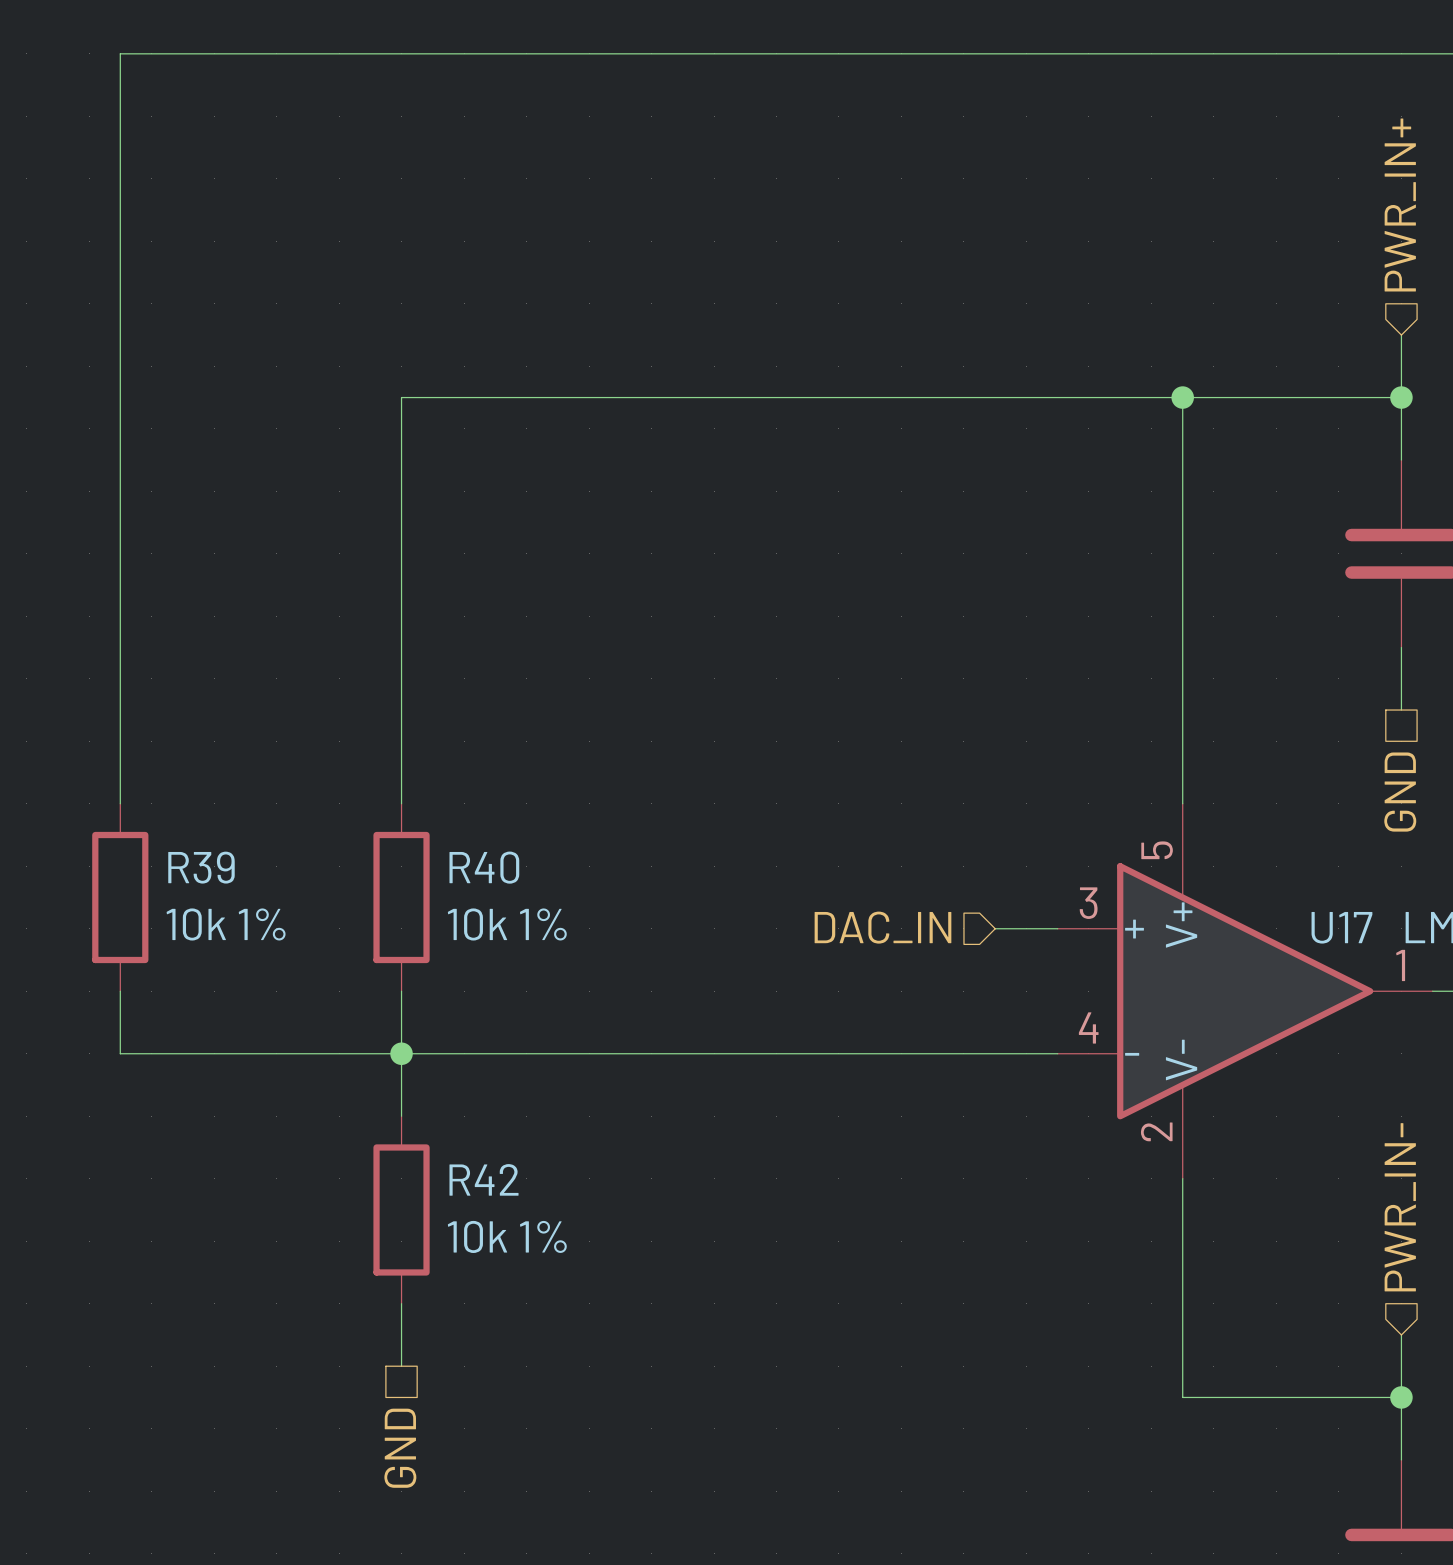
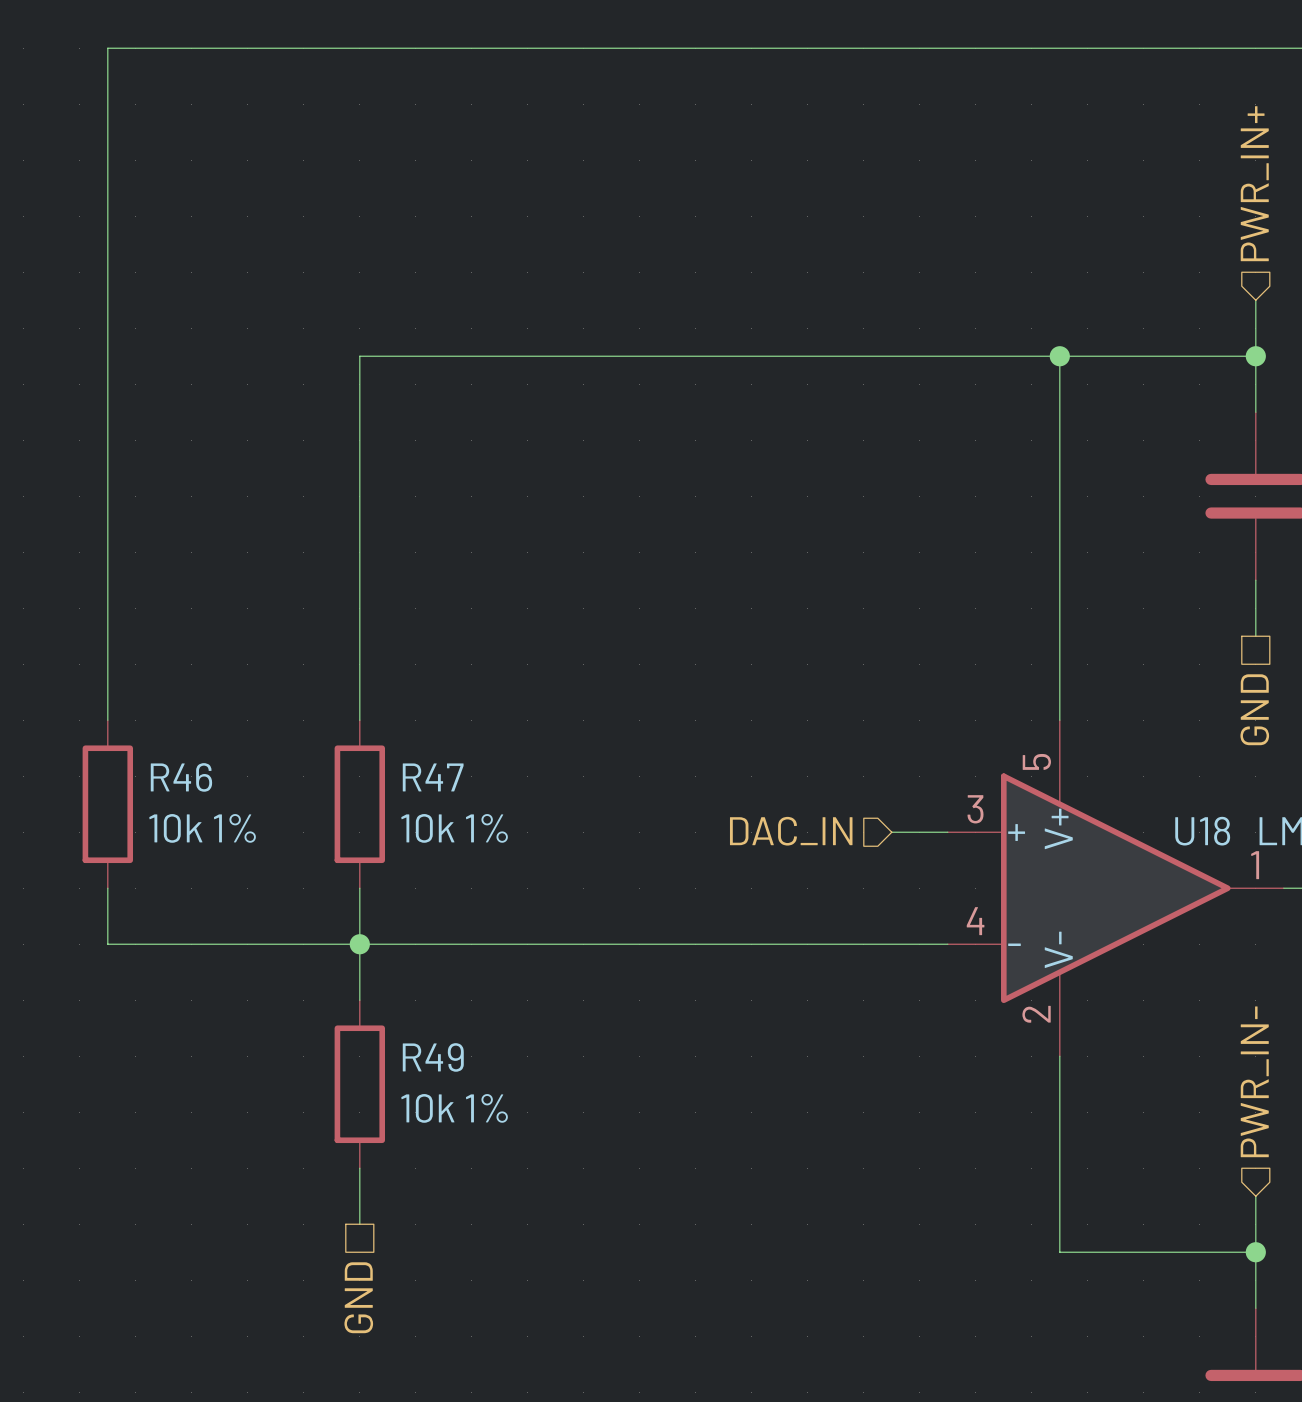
R39 name: R39 (201, 867) -> R46 (181, 777)
R40 name: R40 (484, 867) -> R47 (433, 777)
U17 name: U17 (1341, 927) -> U18 (1202, 831)
R42 name: R42 (484, 1179) -> R49 (433, 1057)

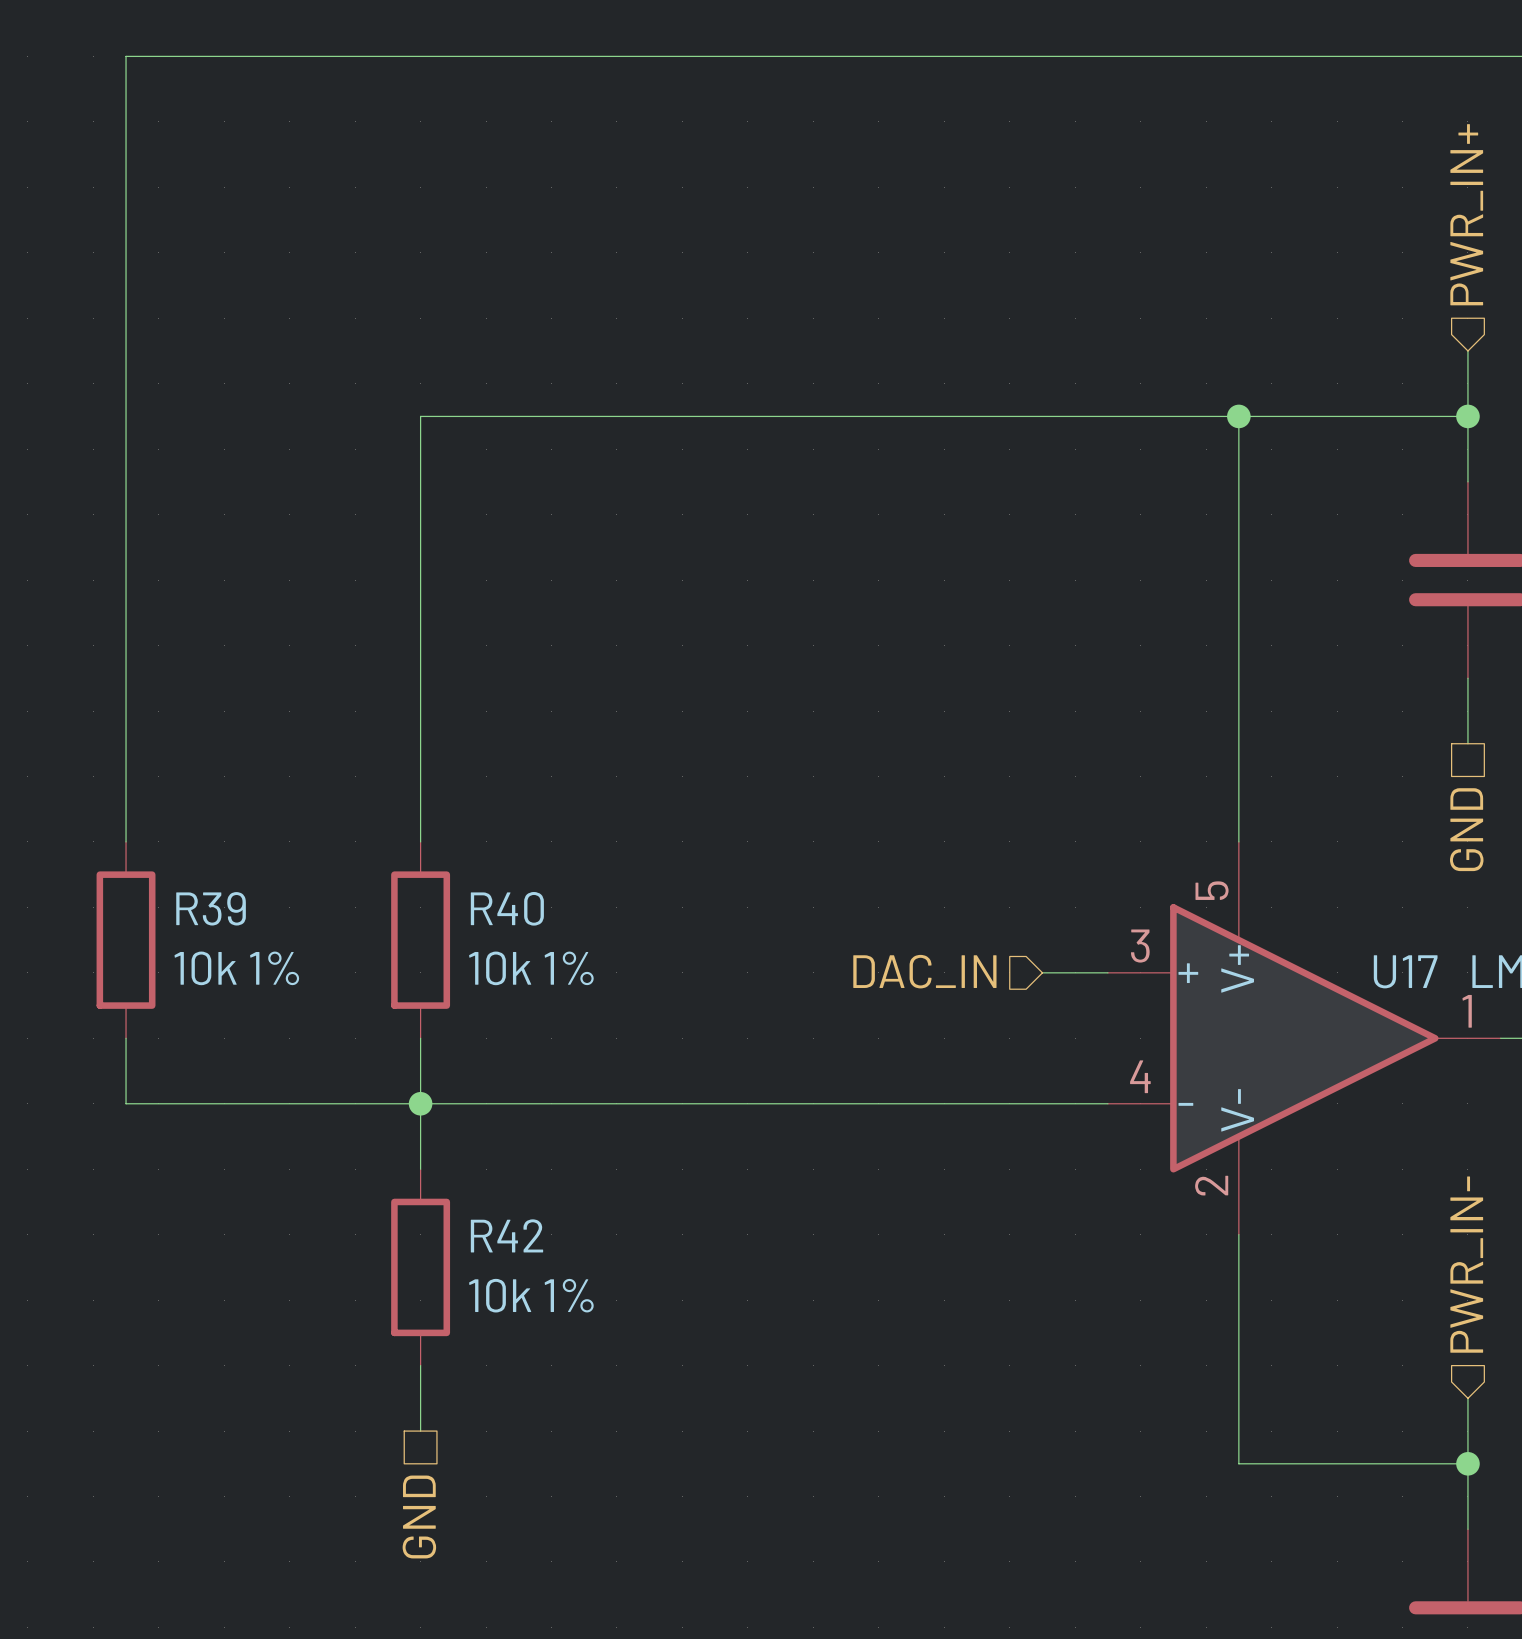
R46 name: R46 (181, 777) -> R39 (211, 908)
R47 name: R47 (433, 777) -> R40 (507, 908)
U18 name: U18 (1202, 831) -> U17 (1405, 971)
R49 name: R49 (433, 1057) -> R42 (506, 1235)

